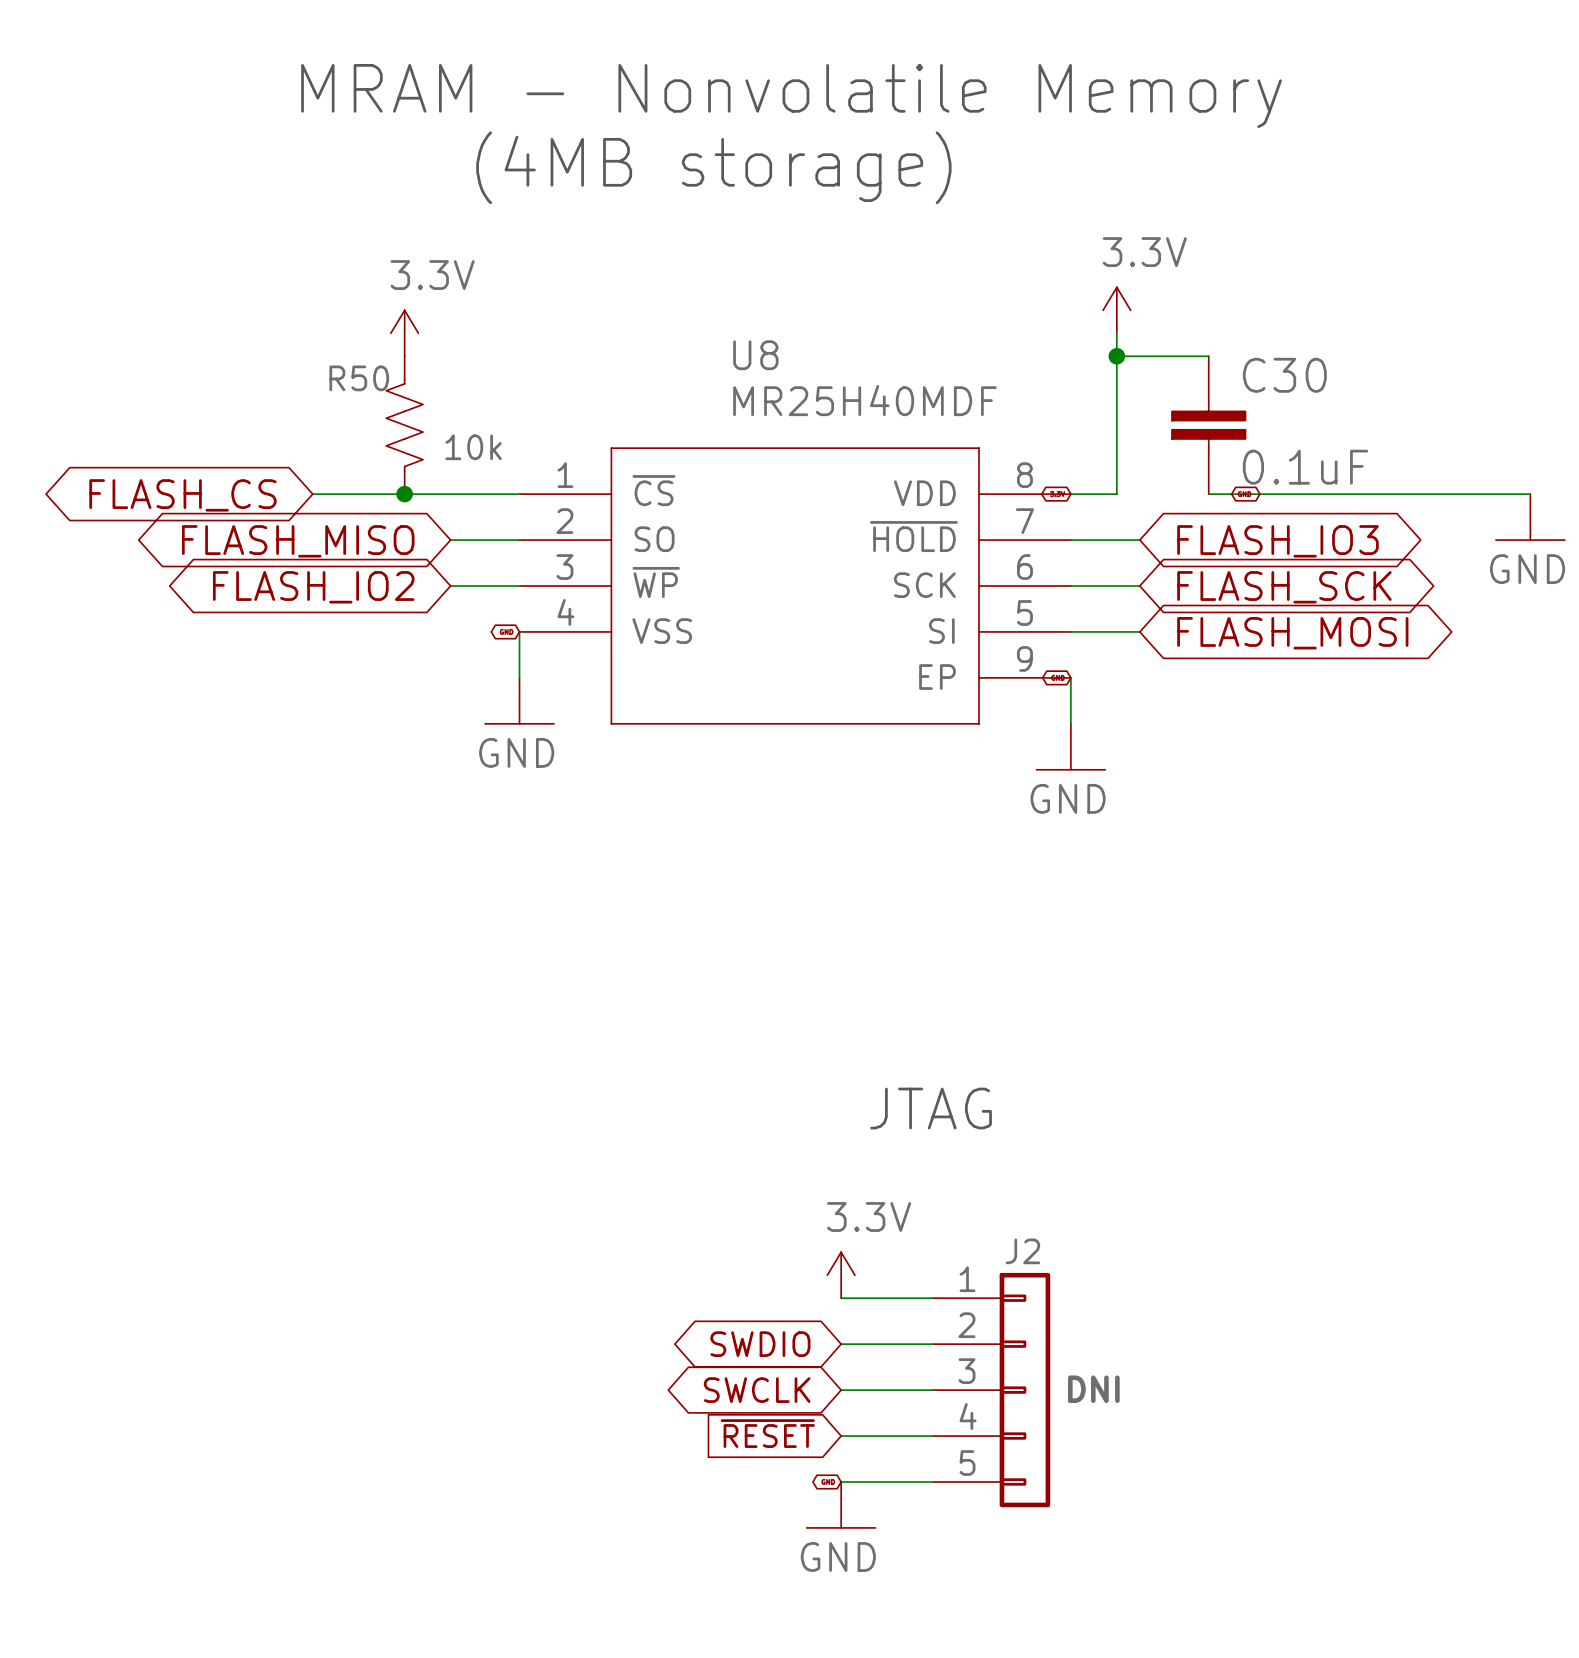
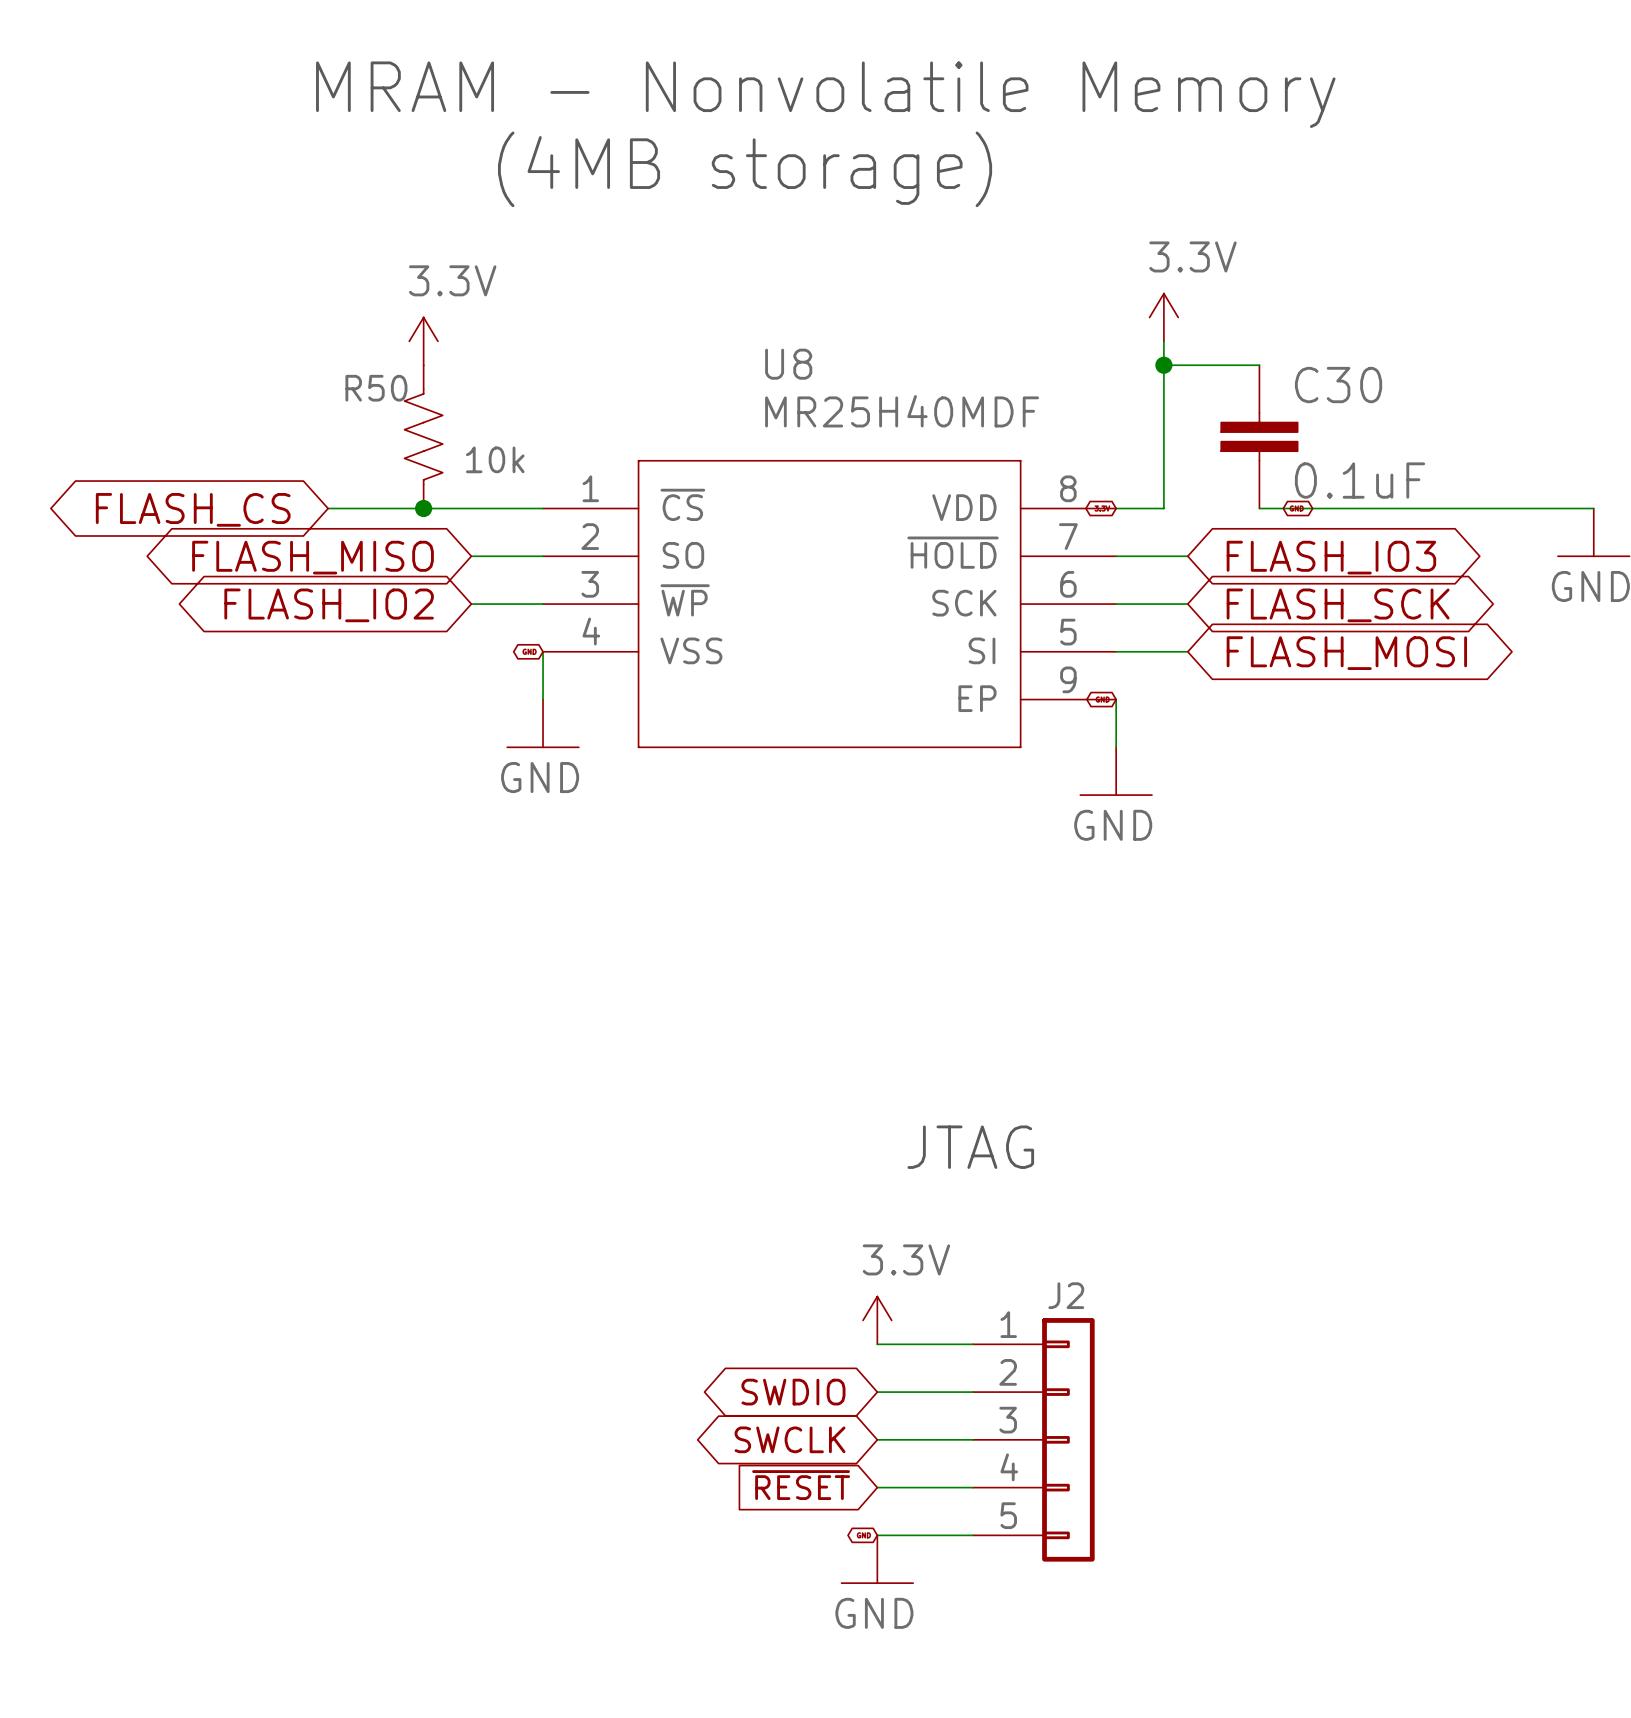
J2 text: DNI (1093, 1389) -> none

